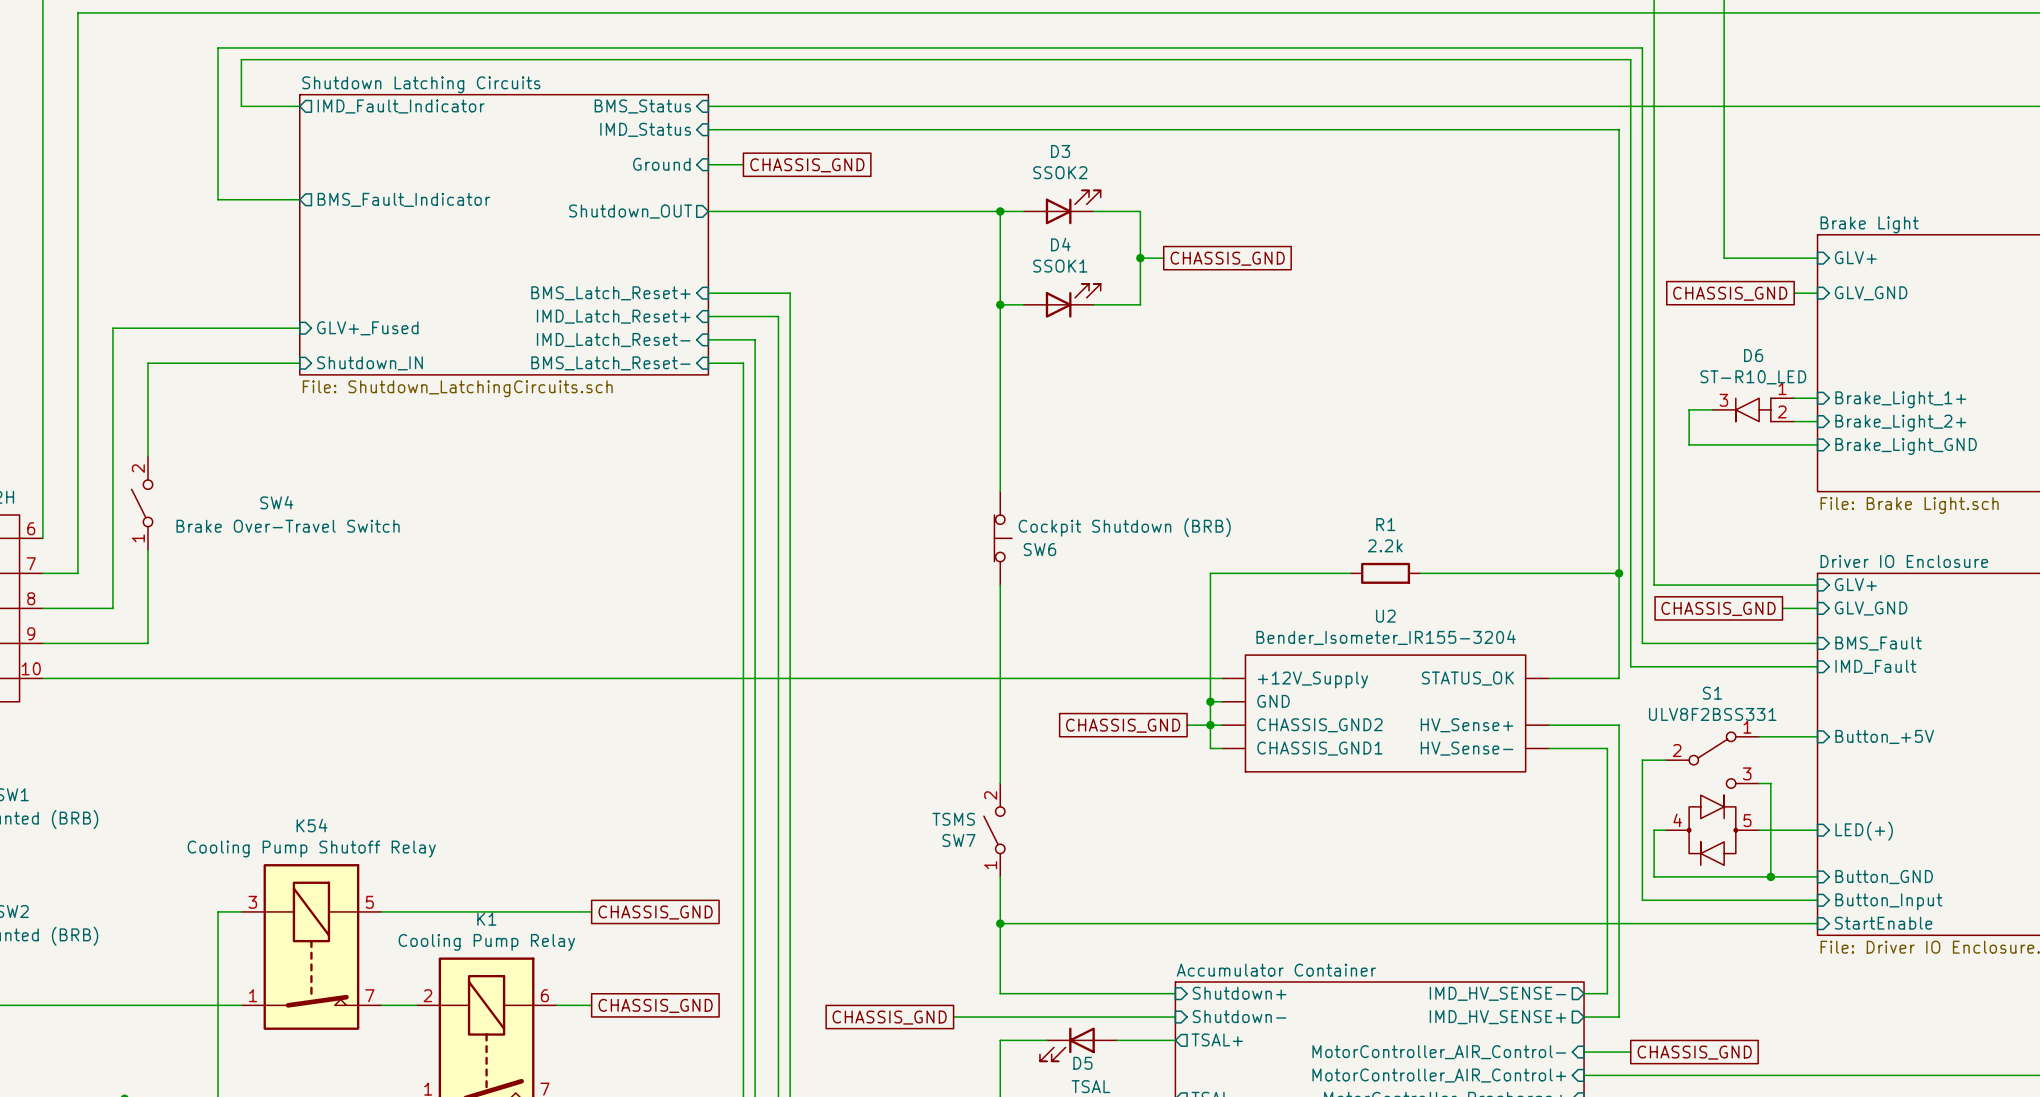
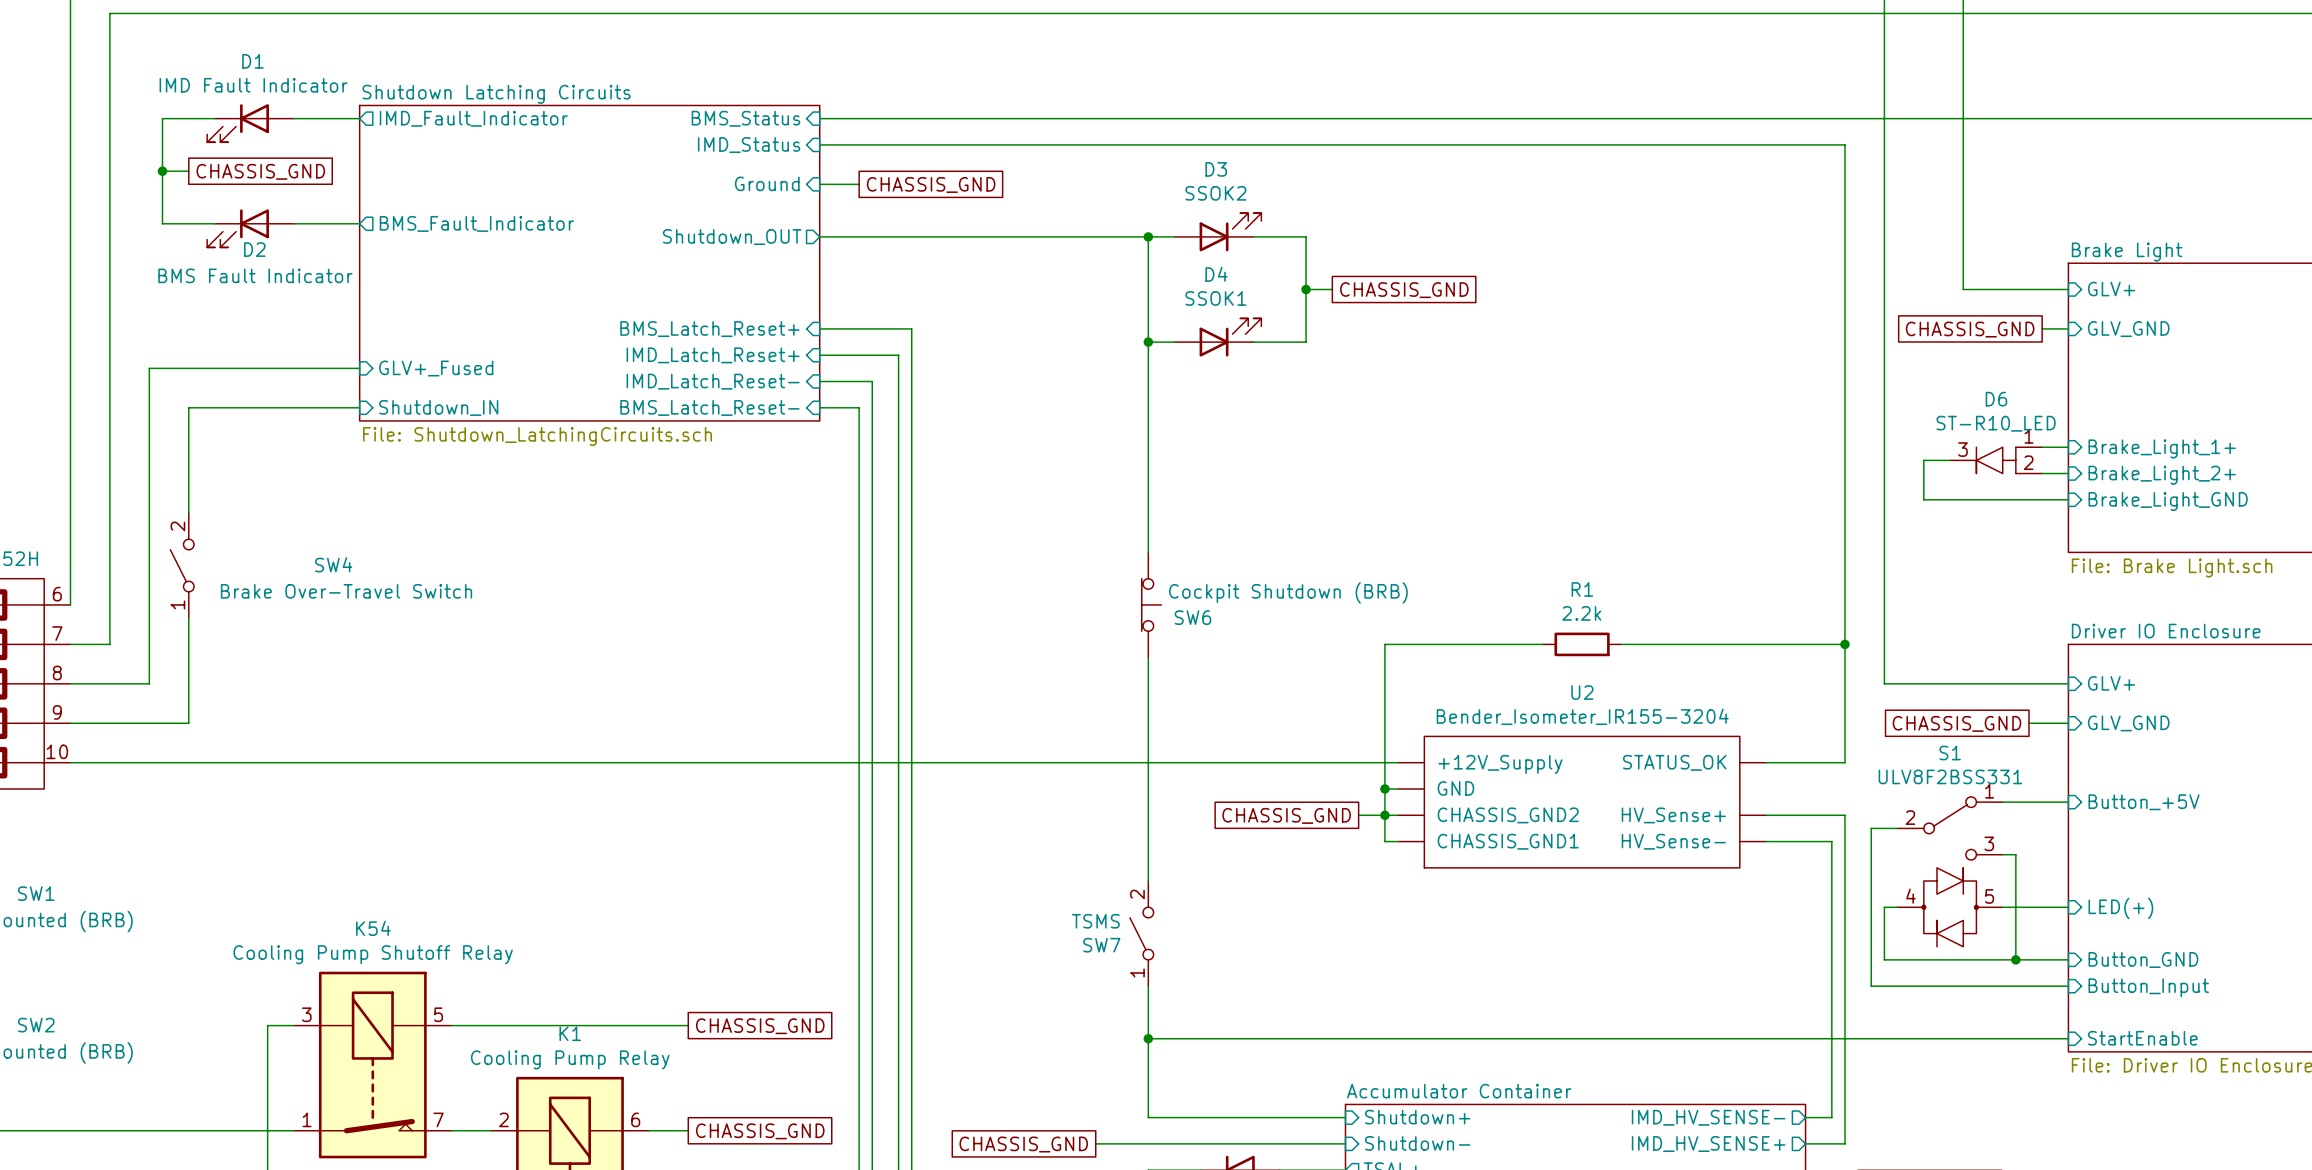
wire: none -> (215, 118) (162, 118) (162, 223) (215, 223)
wire: (241, 106) (241, 59) (1630, 59) (1630, 666) (1817, 666) -> none
D1: none -> IMD Fault Indicator (250, 123)
wire: none -> (162, 171) (188, 171)
junction: none -> (162, 171)
global label: none -> CHASSIS_GND (260, 171)
wire: (241, 199) (218, 199) (218, 47) (1642, 47) (1642, 643) (1782, 643) -> none
D2: none -> BMS Fault Indicator (250, 228)
sheet pin: GLV+ (1855, 584) -> none
wire: (1654, 585) (1817, 585) -> (1884, 657) (1884, 683) (2028, 683)
global label position: CHASSIS_GND (1718, 608) -> CHASSIS_GND (1956, 723)
sheet pin: GLV_GND (1871, 608) -> GLV+ (2111, 683)
sheet pin: BMS_Fault (1878, 643) -> GLV_GND (2128, 723)
sheet pin: IMD_Fault (1875, 666) -> none
wire: (1759, 736) (1817, 736) -> (2002, 802) (2068, 802)
sheet pin position: Button_+5V (1884, 736) -> Button_+5V (2144, 802)
wire: (1642, 760) (1665, 760) -> (1871, 854) (1871, 828) (1897, 828)
wire: (1759, 783) (1770, 783) -> (2002, 854) (2015, 854) (2015, 881)
S1 position: (1712, 798) -> (1950, 871)
wire: (1654, 830) (1665, 830) -> (1884, 933) (1884, 907) (1897, 907)
wire: (1759, 830) (1817, 830) -> (2002, 907) (2068, 907)
sheet pin position: LED(+) (1864, 831) -> LED(+) (2120, 908)
wire: (1654, 853) (1654, 876) -> (1871, 986) (1884, 986)
wire: none -> (1884, 959) (2068, 959)
wire: (1770, 853) (1770, 876) -> none
sheet pin: none -> Button_GND (2143, 960)
wire: (1642, 876) (1642, 900) (1817, 900) -> none
junction position: (1770, 876) -> (2015, 959)
sheet pin: Button_GND (1884, 877) -> Button_Input (2148, 987)
sheet pin: Button_Input (1888, 901) -> none

